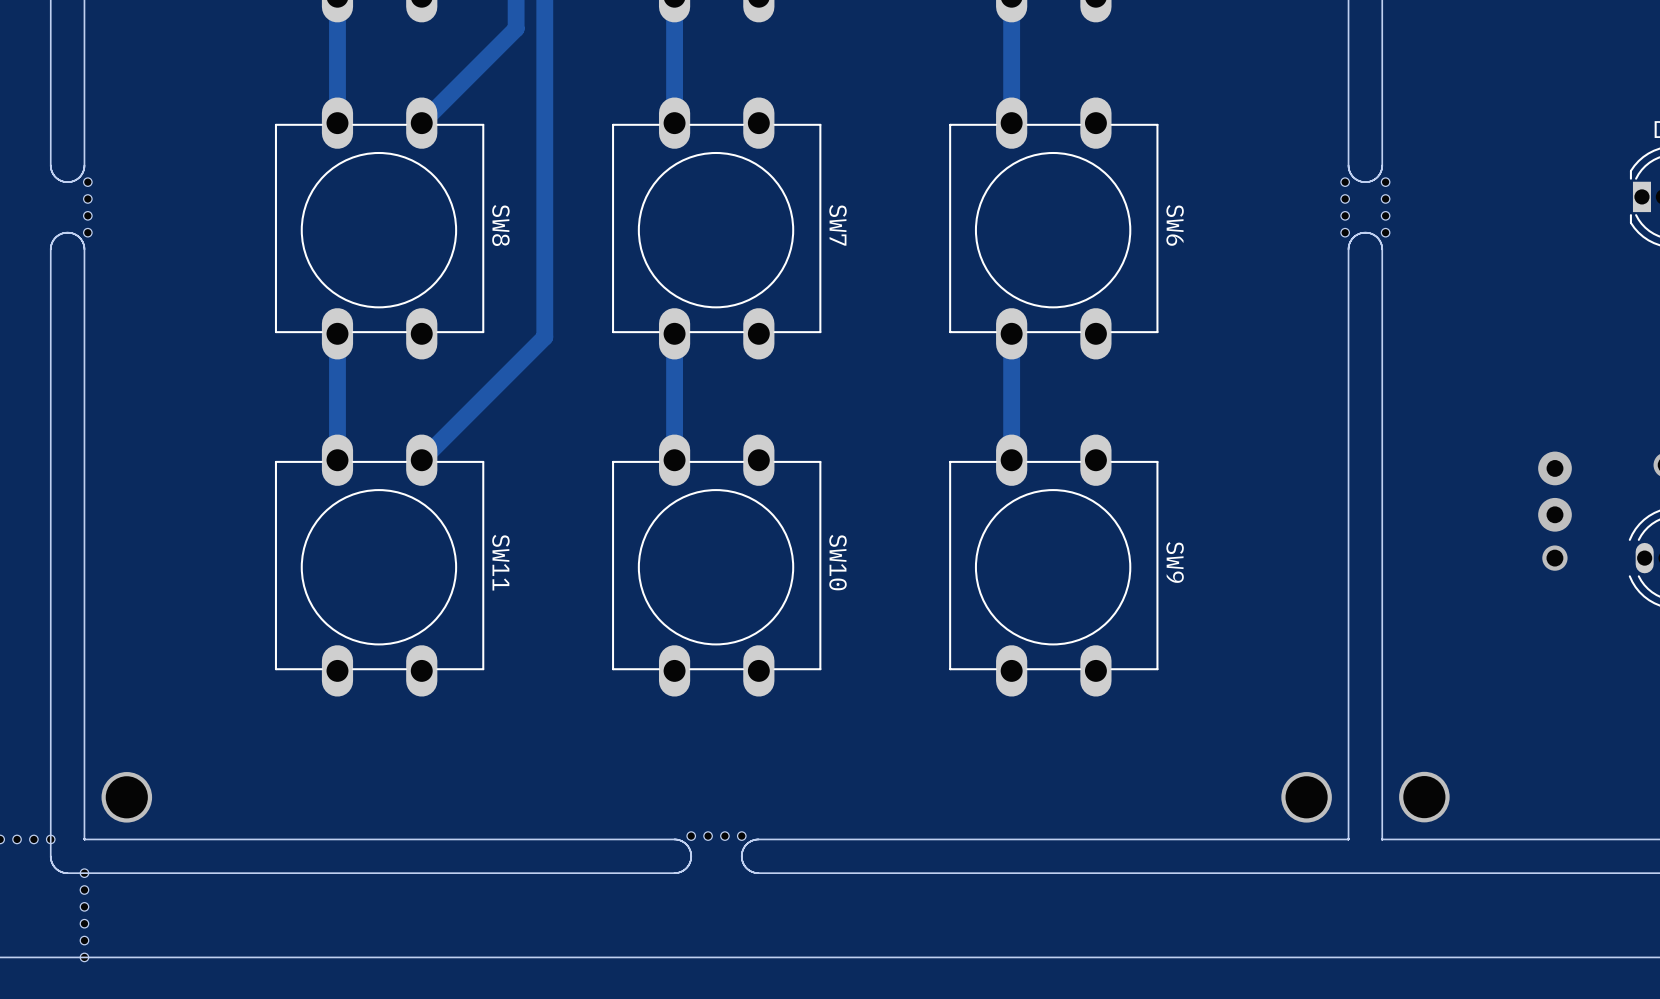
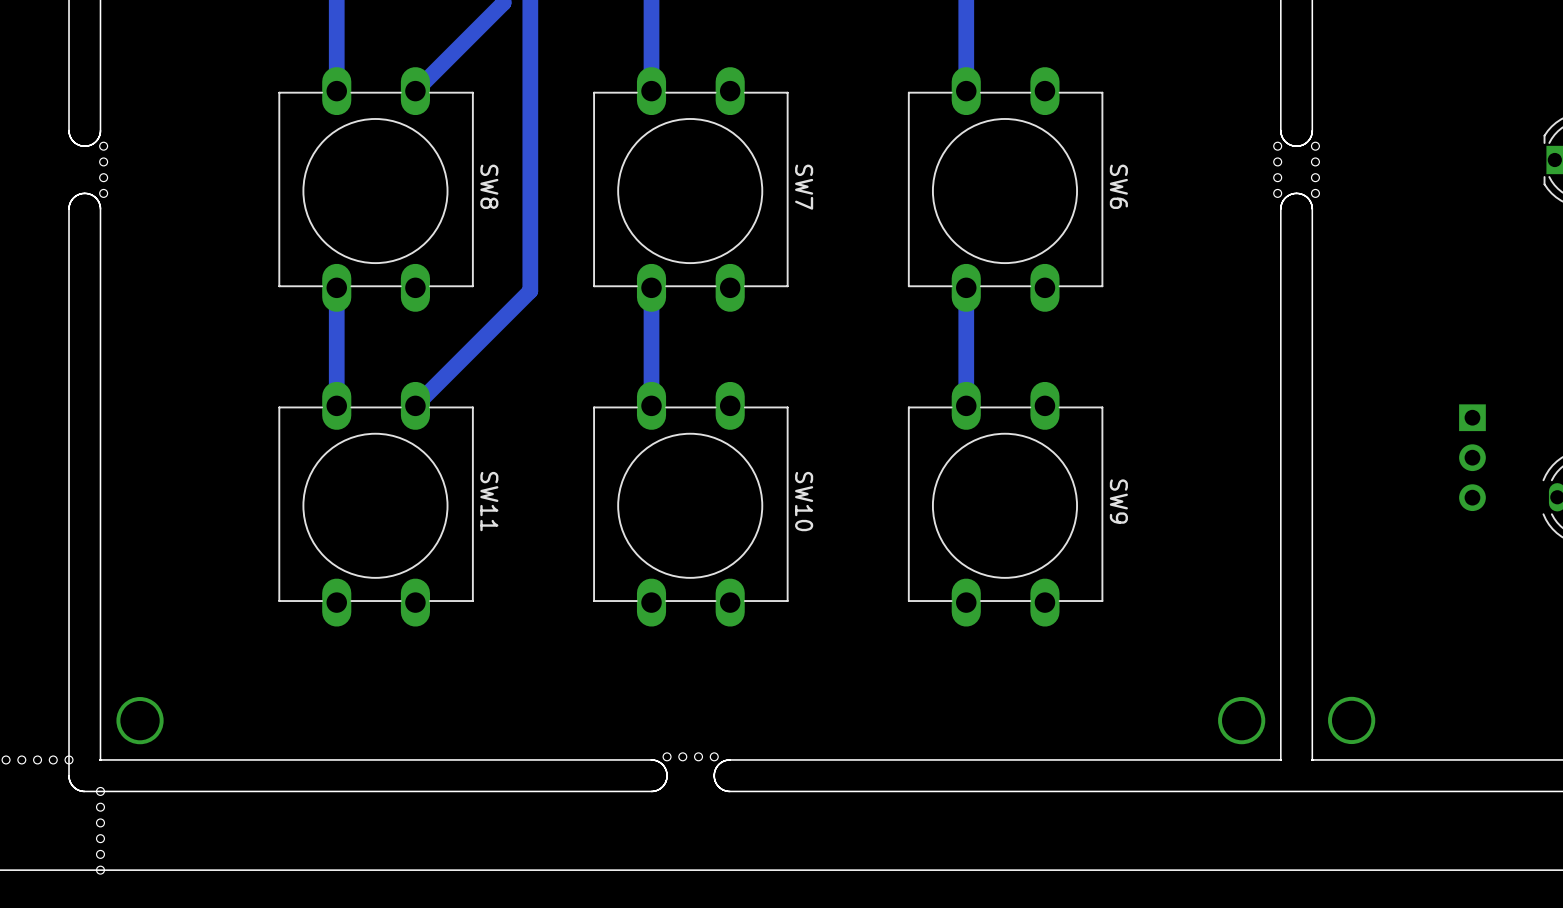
via: (1554, 468) -> none
via: (1554, 514) -> none
part: none -> (1472, 457)
via: (1554, 558) -> none

